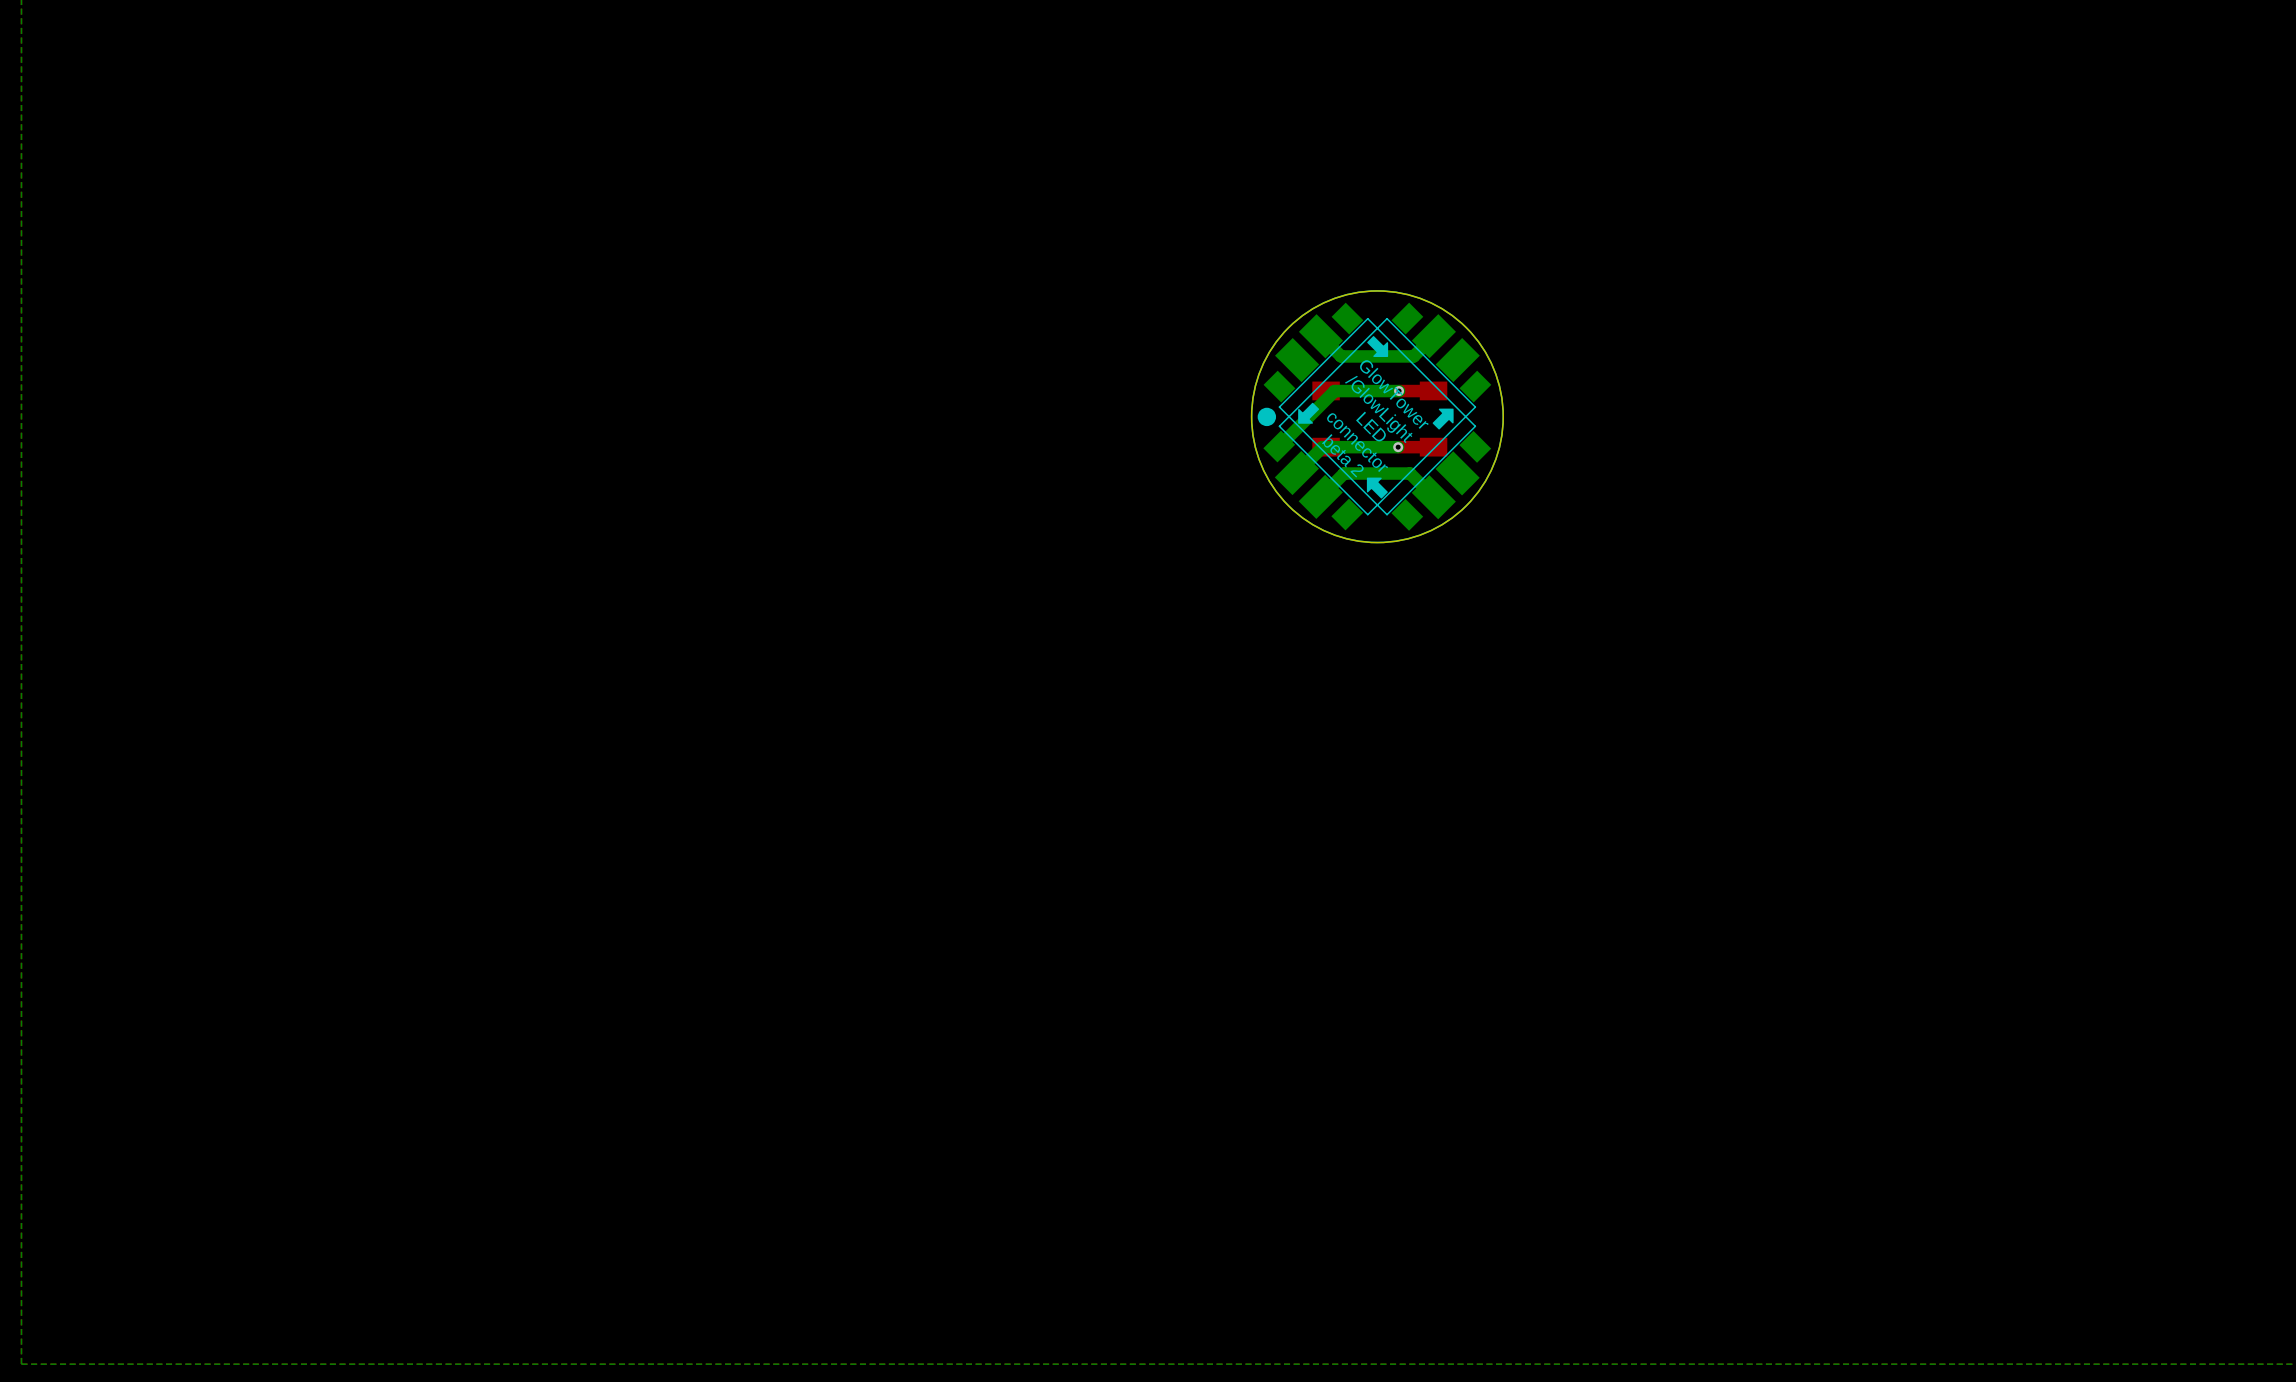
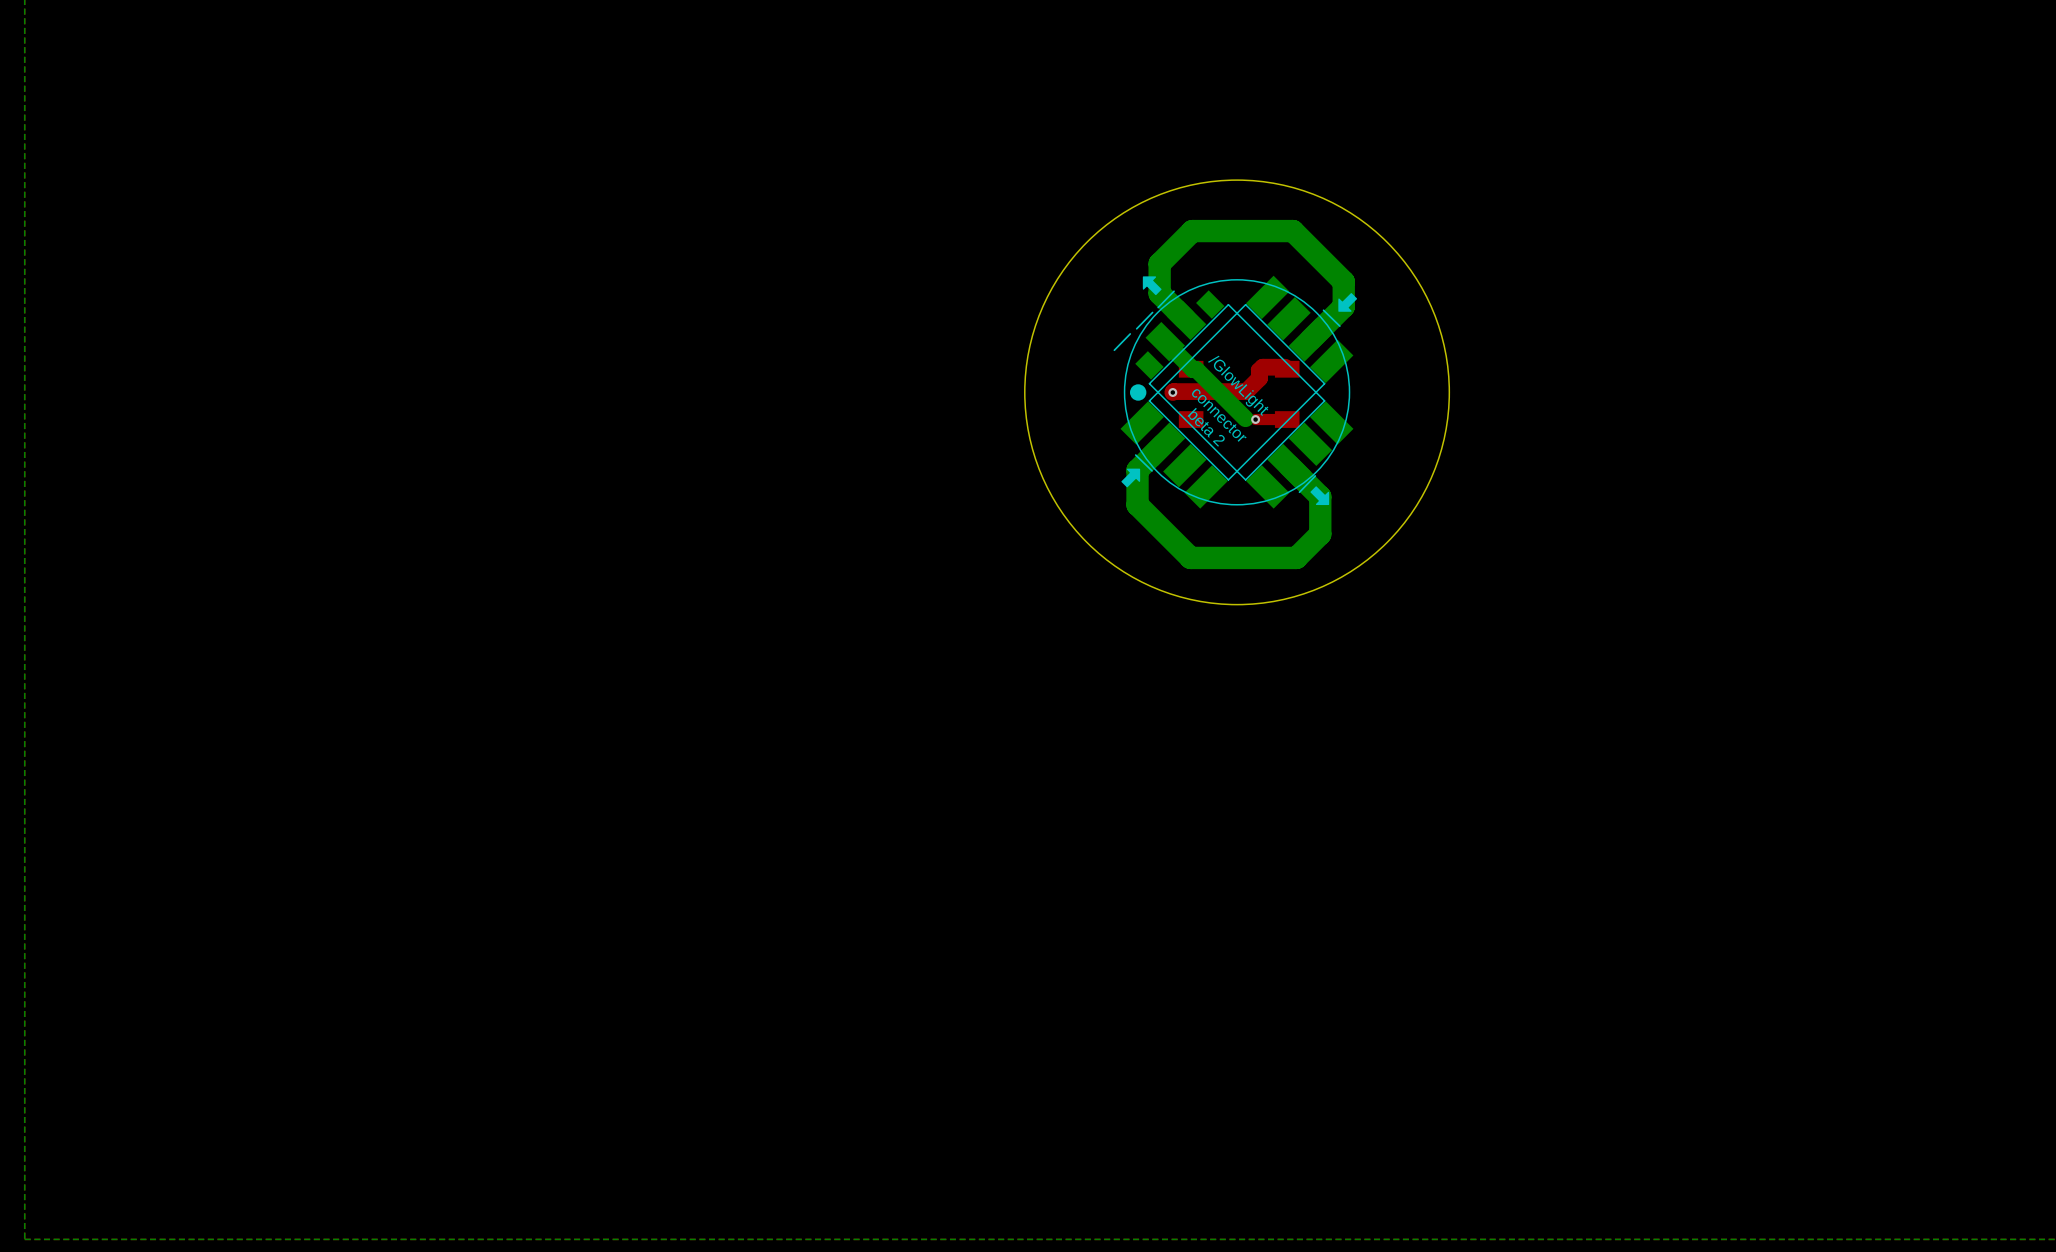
round board edge size: [1251, 290, 1504, 544] -> [1024, 179, 1450, 606]
part footprint: [1391, 302, 1492, 403] -> [1245, 275, 1354, 384]
line: none -> (1174, 291) (1158, 307)
line: none -> (1323, 310) (1339, 326)
line: none -> (1152, 312) (1136, 328)
bottom track: none -> (1185, 318) (1159, 293) (1159, 263) (1192, 231) (1293, 231) (1343, 281) (1343, 306) (1310, 340)
bottom track: (1429, 340) (1413, 356) (1341, 356) (1325, 340) -> none
drawing position: (1377, 346) -> (1319, 495)
line: none -> (1130, 333) (1114, 350)
bottom track: none -> (1163, 340) (1245, 418)
top track: none -> (1285, 367) (1262, 367) (1259, 370) (1259, 378) (1246, 391) (1172, 392)
bottom track: (1399, 391) (1334, 391) (1279, 446) -> none
via: (1399, 391) -> none
text: GlowTower (1394, 394) -> none
drawing position: (1308, 413) -> (1347, 302)
via: none -> (1172, 392)
drawing position: (1443, 419) -> (1130, 477)
text: LED (1370, 426) -> none
part footprint: [1263, 430, 1364, 531] -> [1120, 401, 1228, 509]
part footprint: [1391, 430, 1492, 531] -> [1246, 401, 1354, 509]
bottom track: (1398, 447) (1322, 447) (1301, 468) -> none
bottom track: none -> (1163, 444) (1137, 470) (1137, 504) (1190, 557) (1296, 557) (1320, 534) (1320, 496) (1289, 465)
line: none -> (1135, 455) (1152, 470)
drawing position: (1377, 488) -> (1152, 285)
bottom track: (1325, 492) (1344, 473) (1410, 473) (1429, 492) -> none
line: none -> (1315, 475) (1299, 492)

